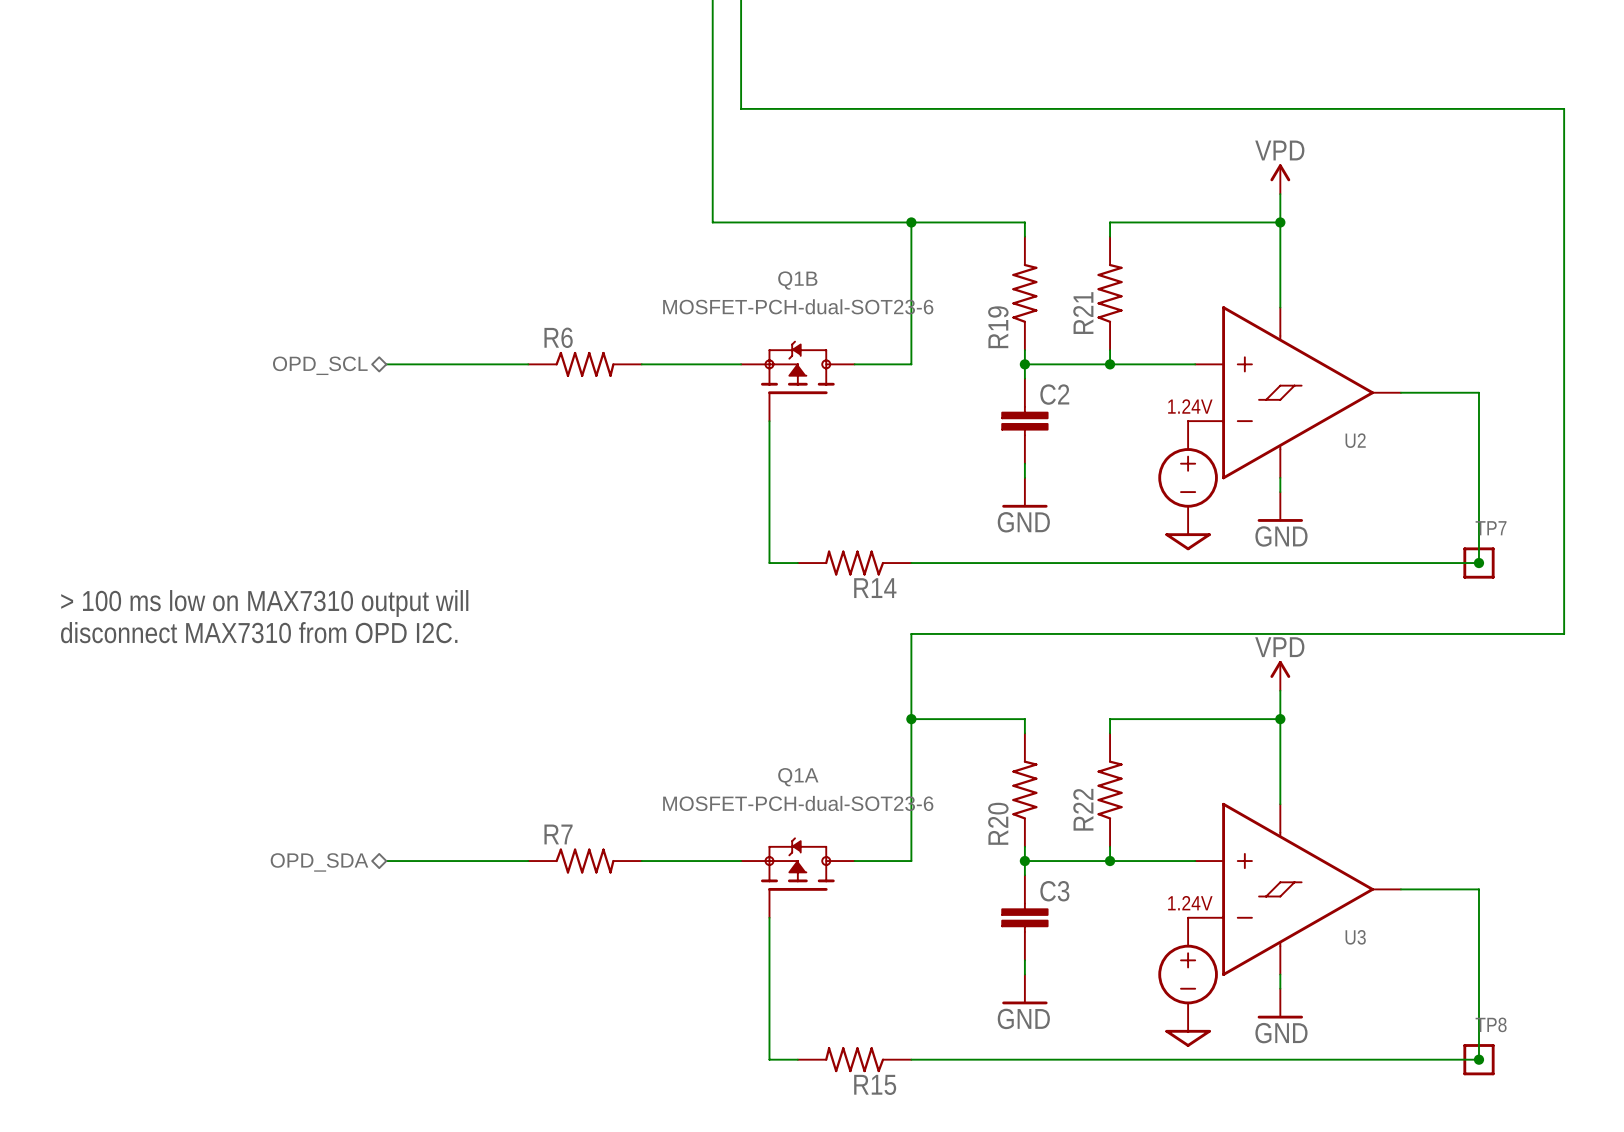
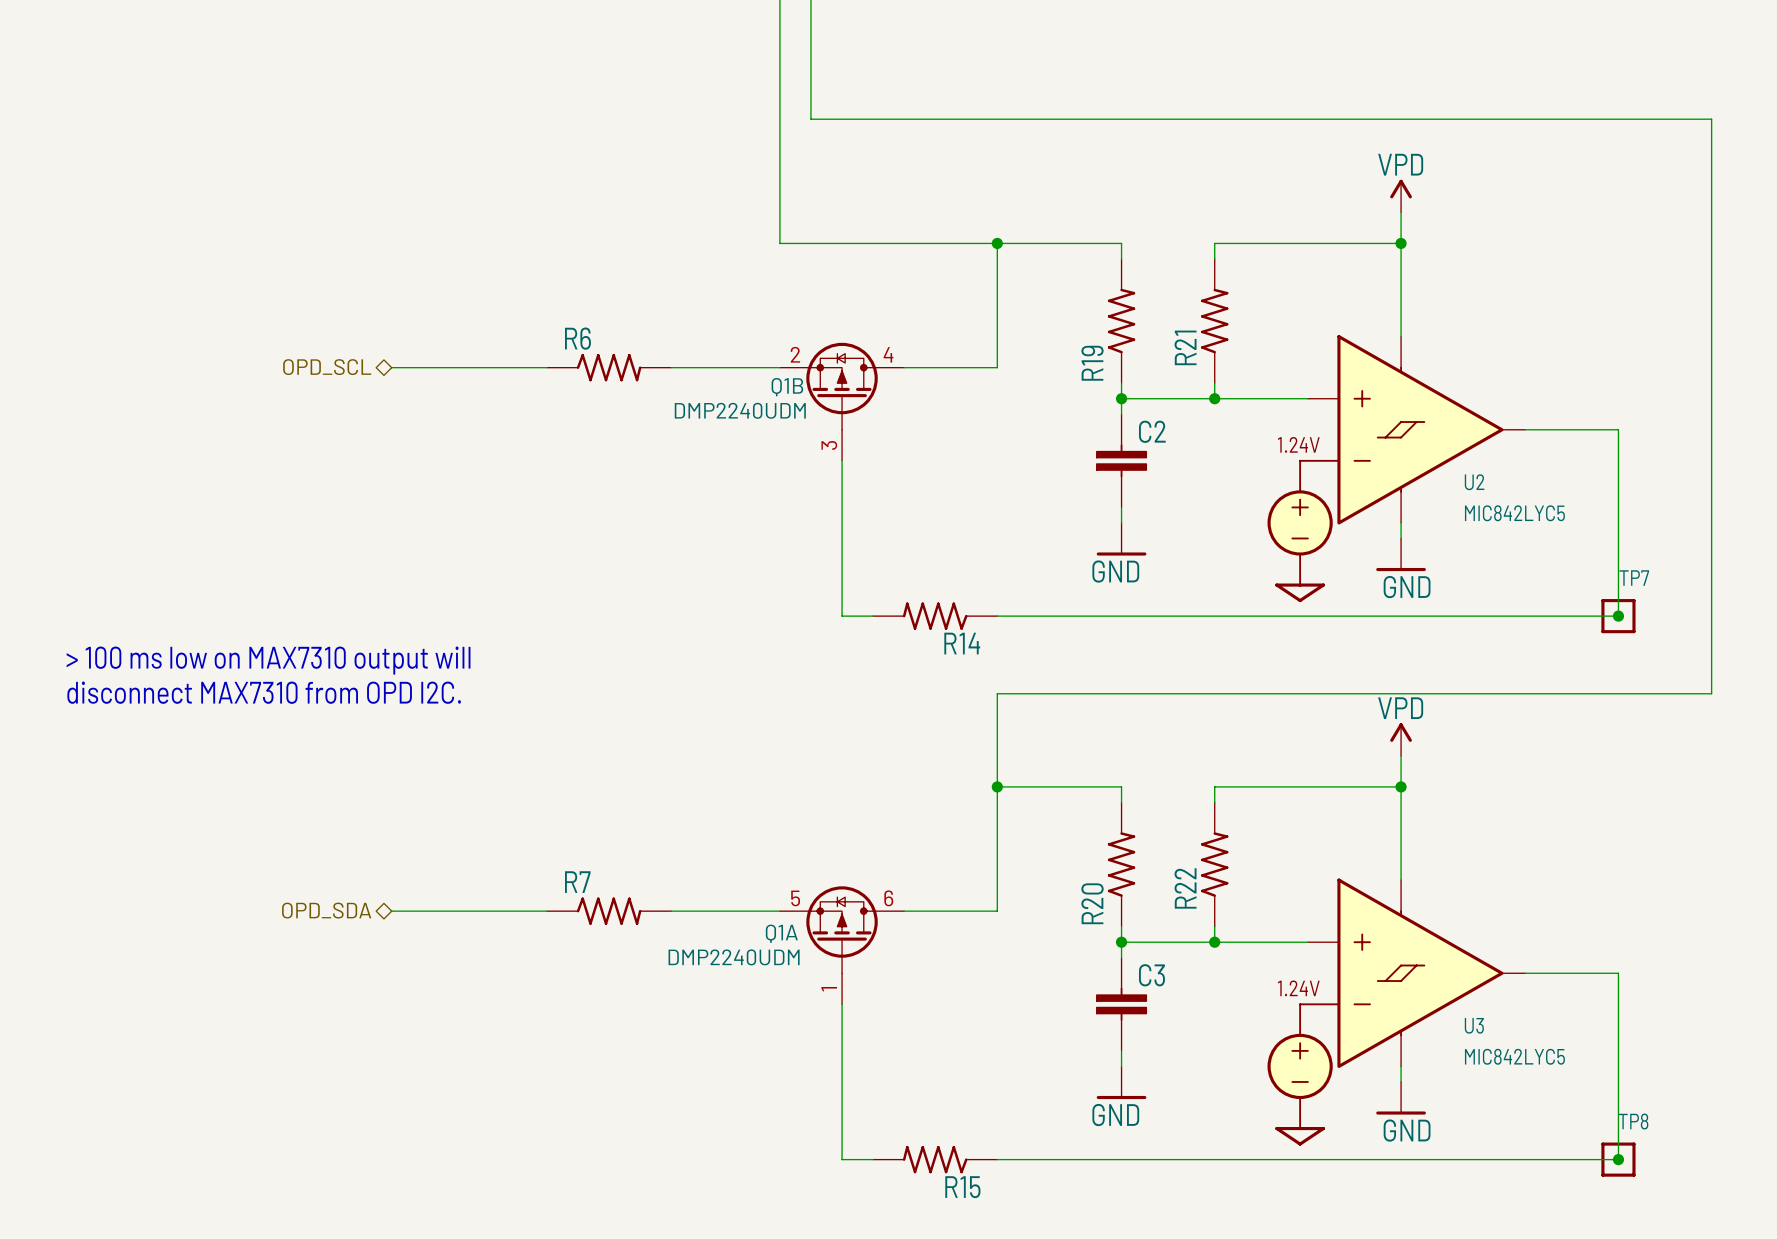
Q1B name position: Q1B (797, 280) -> Q1B (787, 387)
Q1B value: MOSFET-PCH-dual-SOT23-6 (798, 306) -> DMP2240UDM (740, 410)
U2 symbol: [1158, 306, 1401, 551] -> [1267, 335, 1526, 603]
wire: (911, 335) (911, 364) (854, 364) -> (997, 367) (904, 367)
Q1B symbol: [741, 340, 855, 422] -> [779, 342, 905, 461]
wire: (386, 364) (528, 364) -> (391, 367) (547, 367)
R6 position: (585, 364) -> (609, 367)
wire: (641, 364) (741, 364) -> (671, 367) (779, 367)
hierarchical label position: OPD_SCL (320, 365) -> OPD_SCL (327, 367)
U2 value: none -> MIC842LYC5 (1514, 513)
Q1A name position: Q1A (798, 777) -> Q1A (781, 933)
U3 symbol: [1158, 802, 1401, 1047] -> [1267, 878, 1526, 1146]
Q1A value: MOSFET-PCH-dual-SOT23-6 (798, 803) -> DMP2240UDM (734, 957)
wire: (911, 832) (911, 861) (854, 861) -> (997, 911) (904, 911)
Q1A symbol: [741, 837, 855, 918] -> [779, 886, 905, 1005]
wire: (386, 861) (528, 861) -> (391, 911) (547, 911)
R7 position: (585, 861) -> (609, 911)
wire: (641, 861) (741, 861) -> (671, 911) (779, 911)
hierarchical label position: OPD_SDA (319, 862) -> OPD_SDA (326, 910)
U3 value: none -> MIC842LYC5 (1514, 1056)

